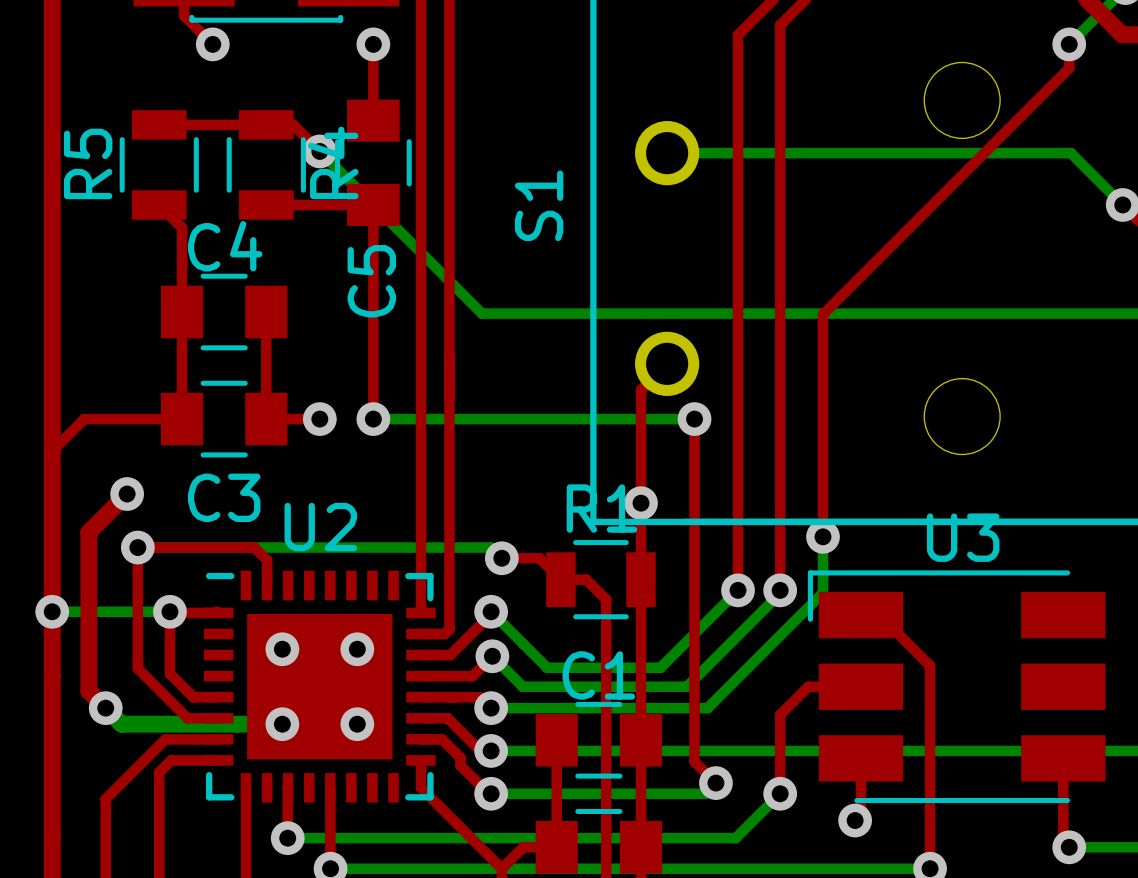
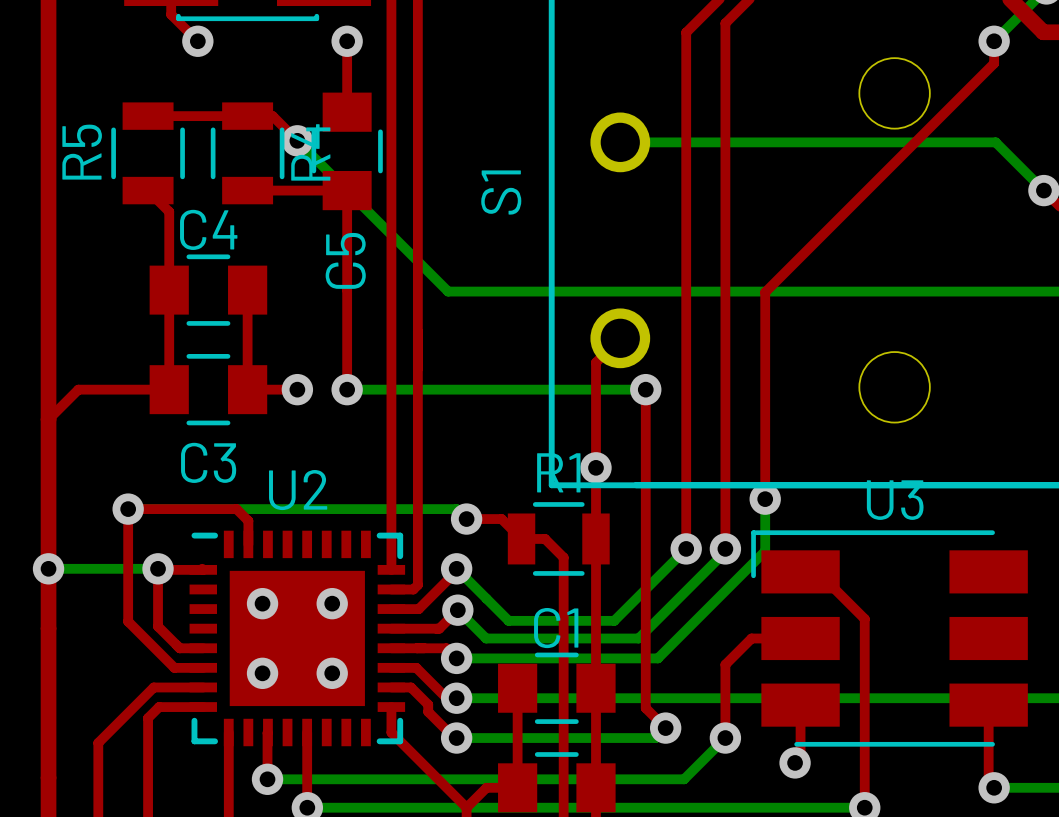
top track: (127, 494) (88, 532) (88, 691) (105, 708) -> none
via: (127, 494) -> none
bottom track: (105, 708) (121, 724) (282, 724) -> none
via: (105, 708) -> none

